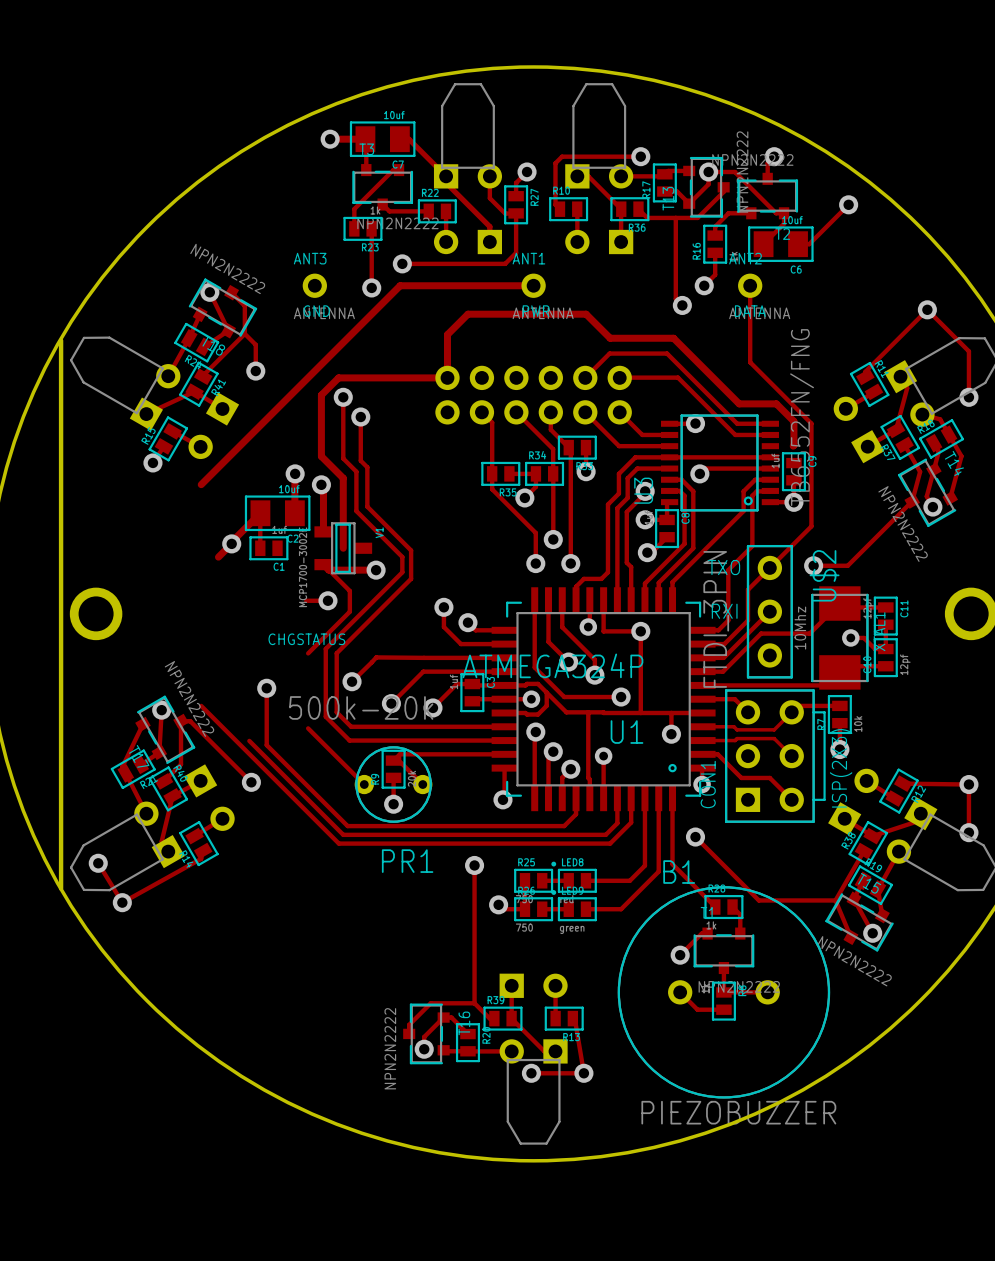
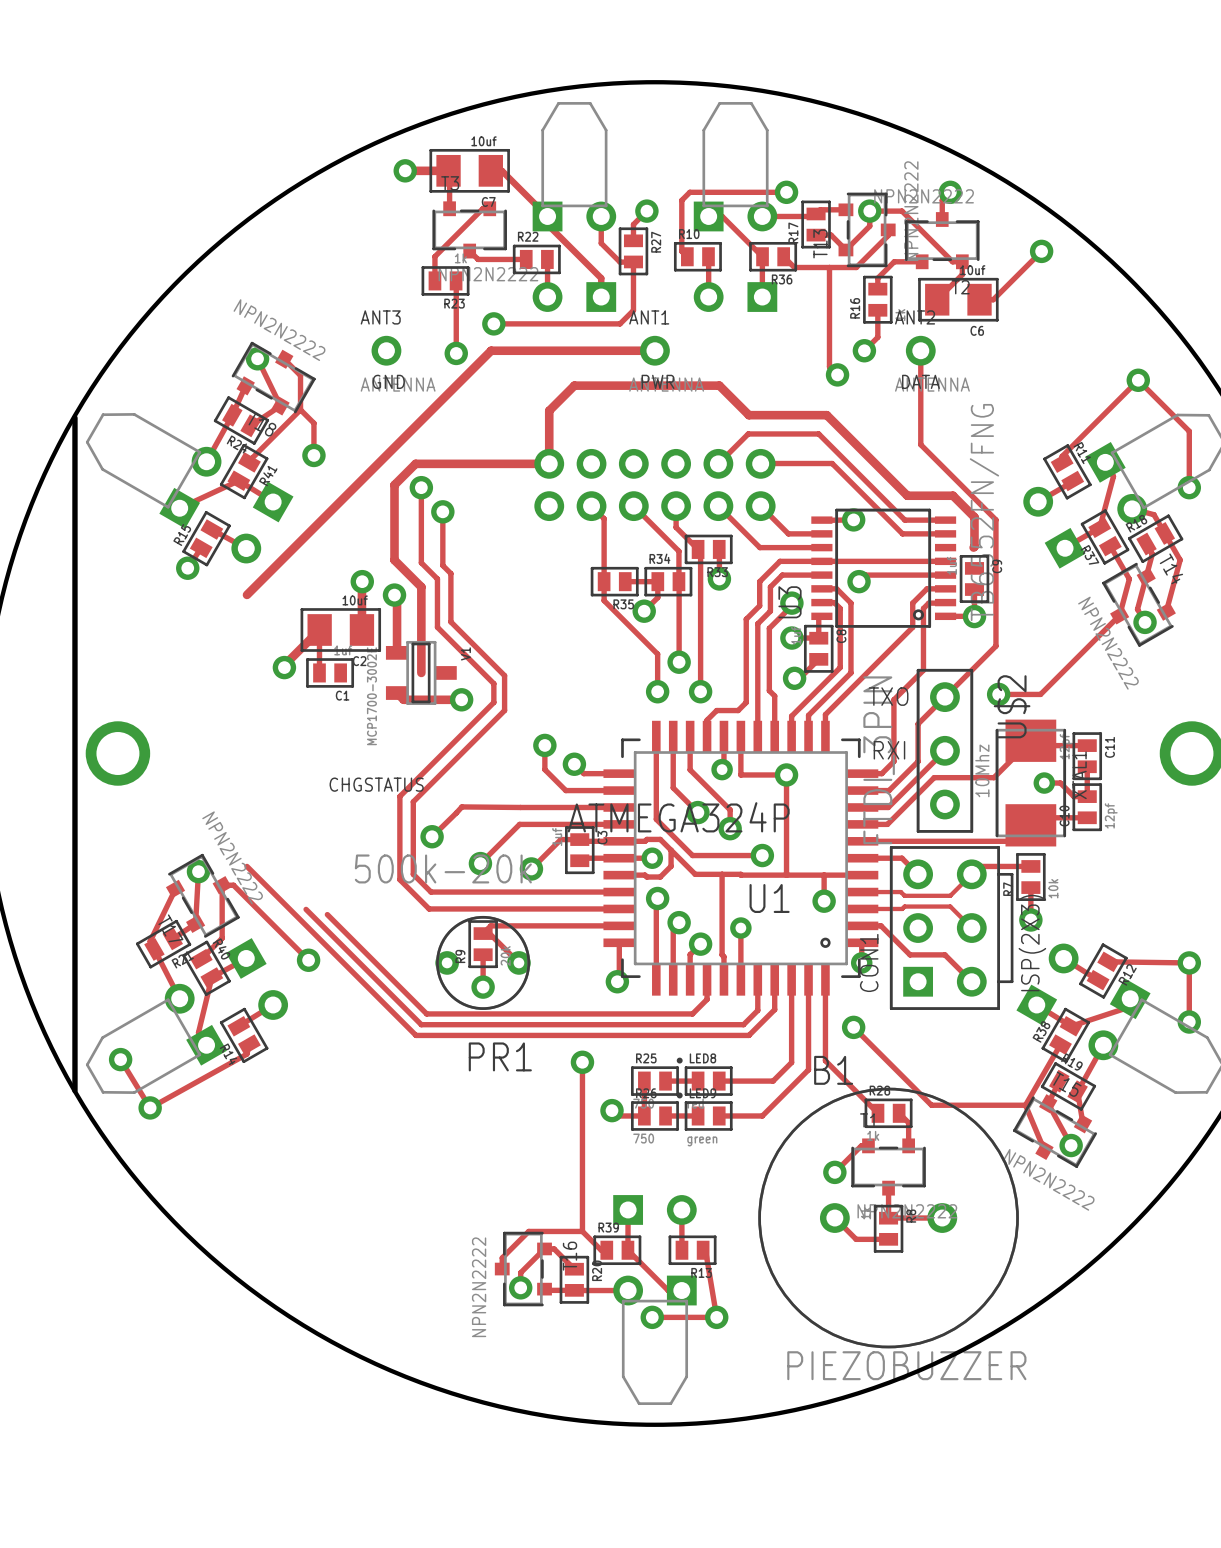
track: (231, 543) (218, 557) -> none
track: (323, 564) (349, 591) (349, 611) (308, 653) -> none
track: (306, 600) (327, 600) -> none
via: (327, 600) -> none
track: (266, 688) (266, 745) -> none
via: (266, 688) -> none
track: (308, 728) (364, 784) -> none

